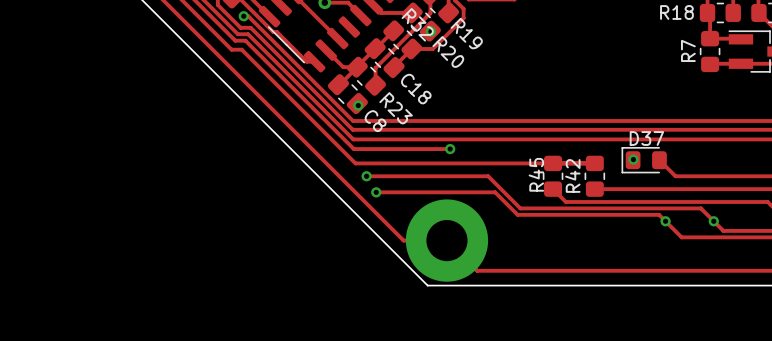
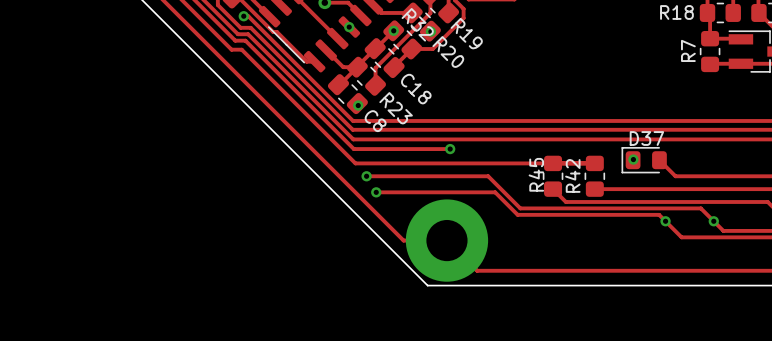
via: none -> (349, 27)
via: none -> (393, 30)

